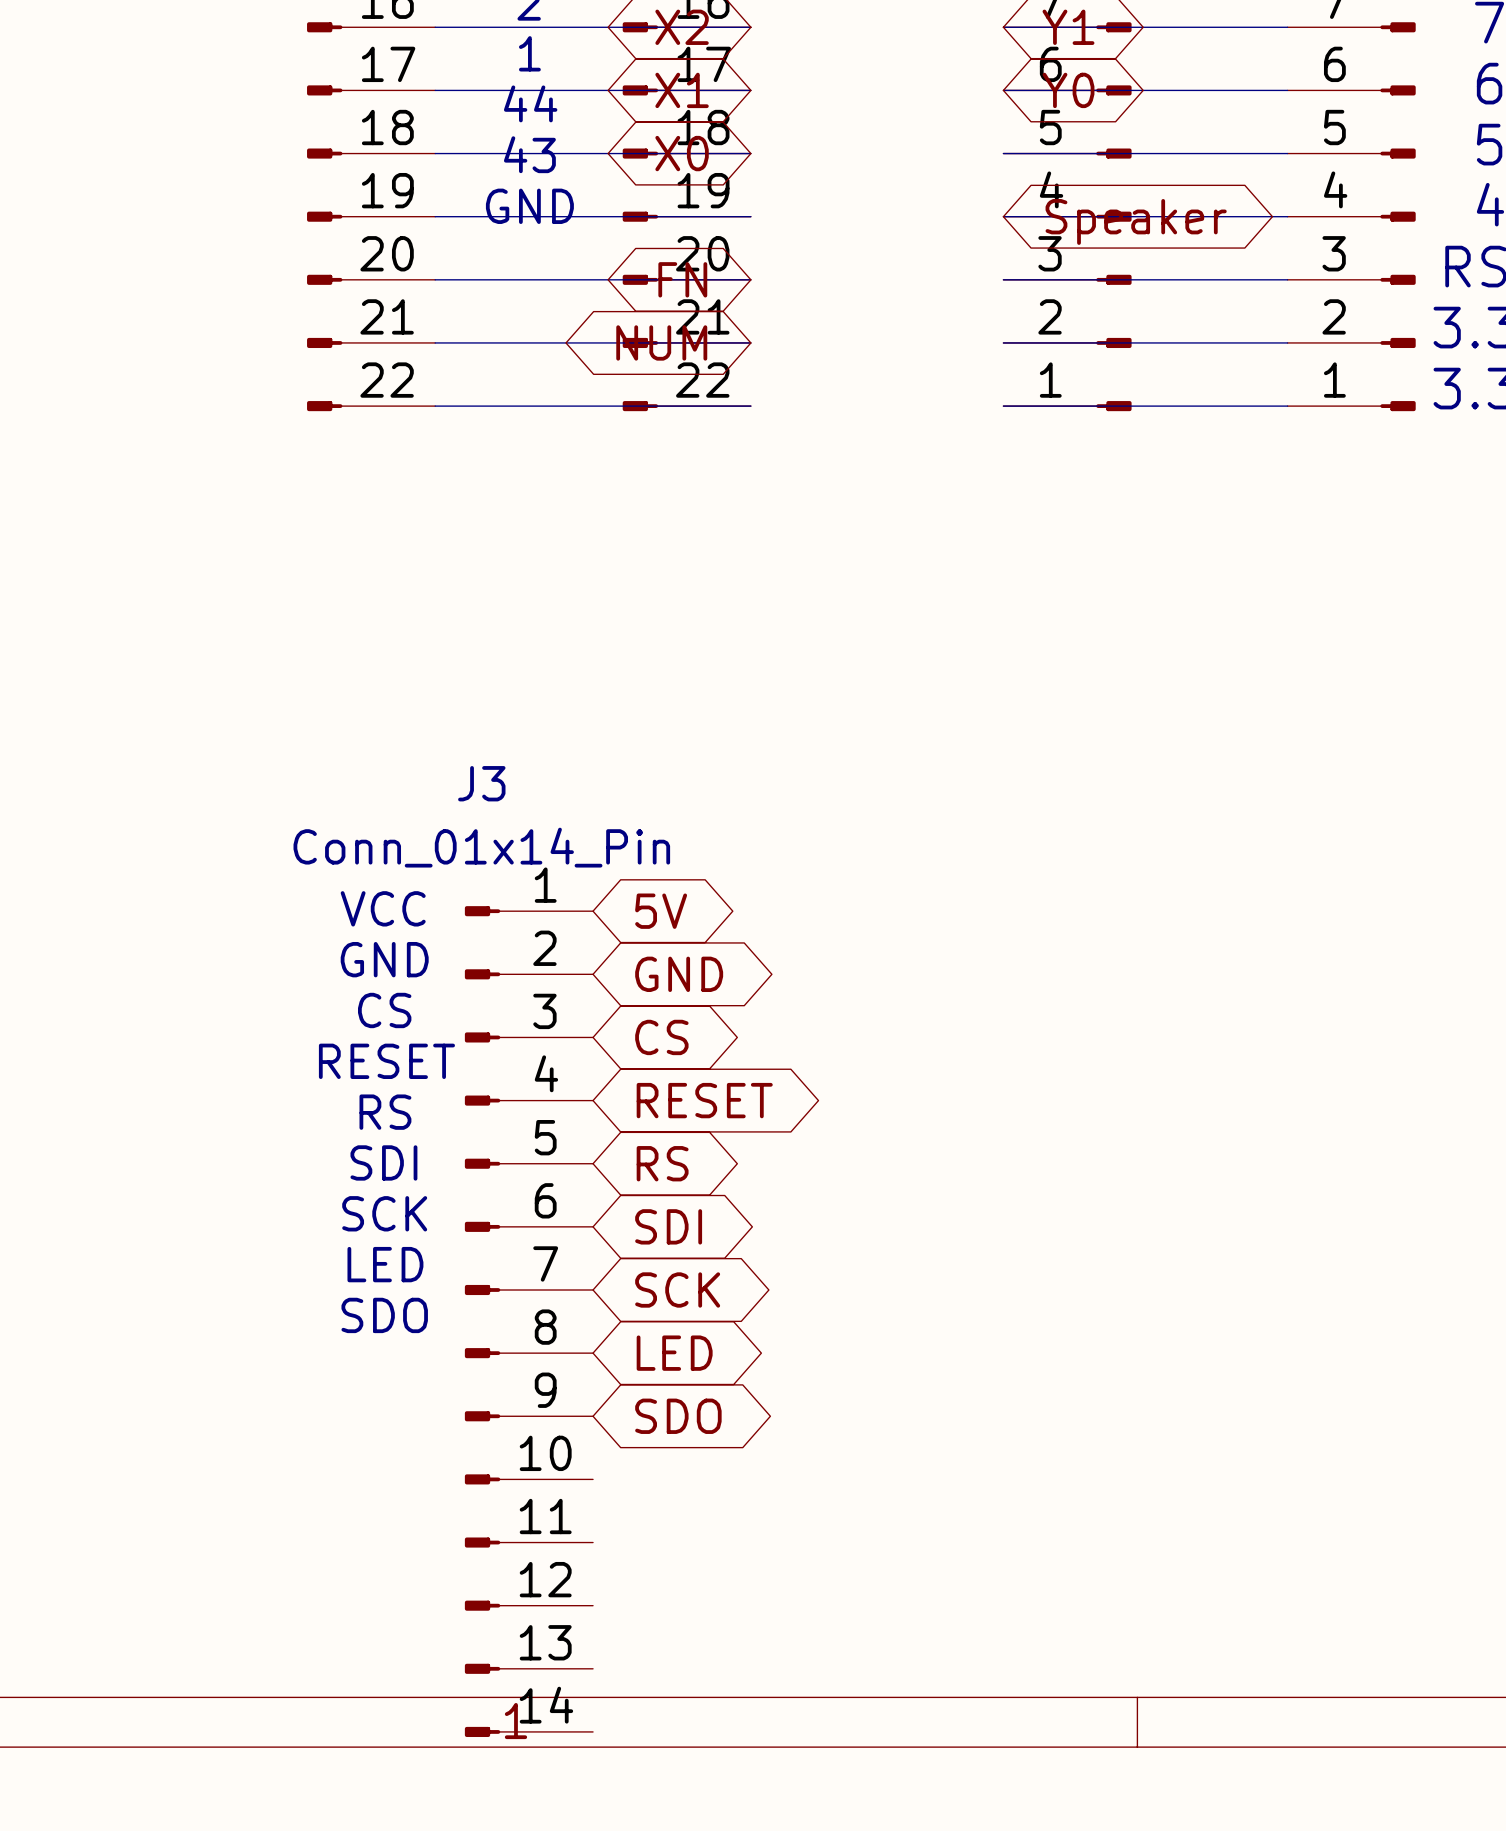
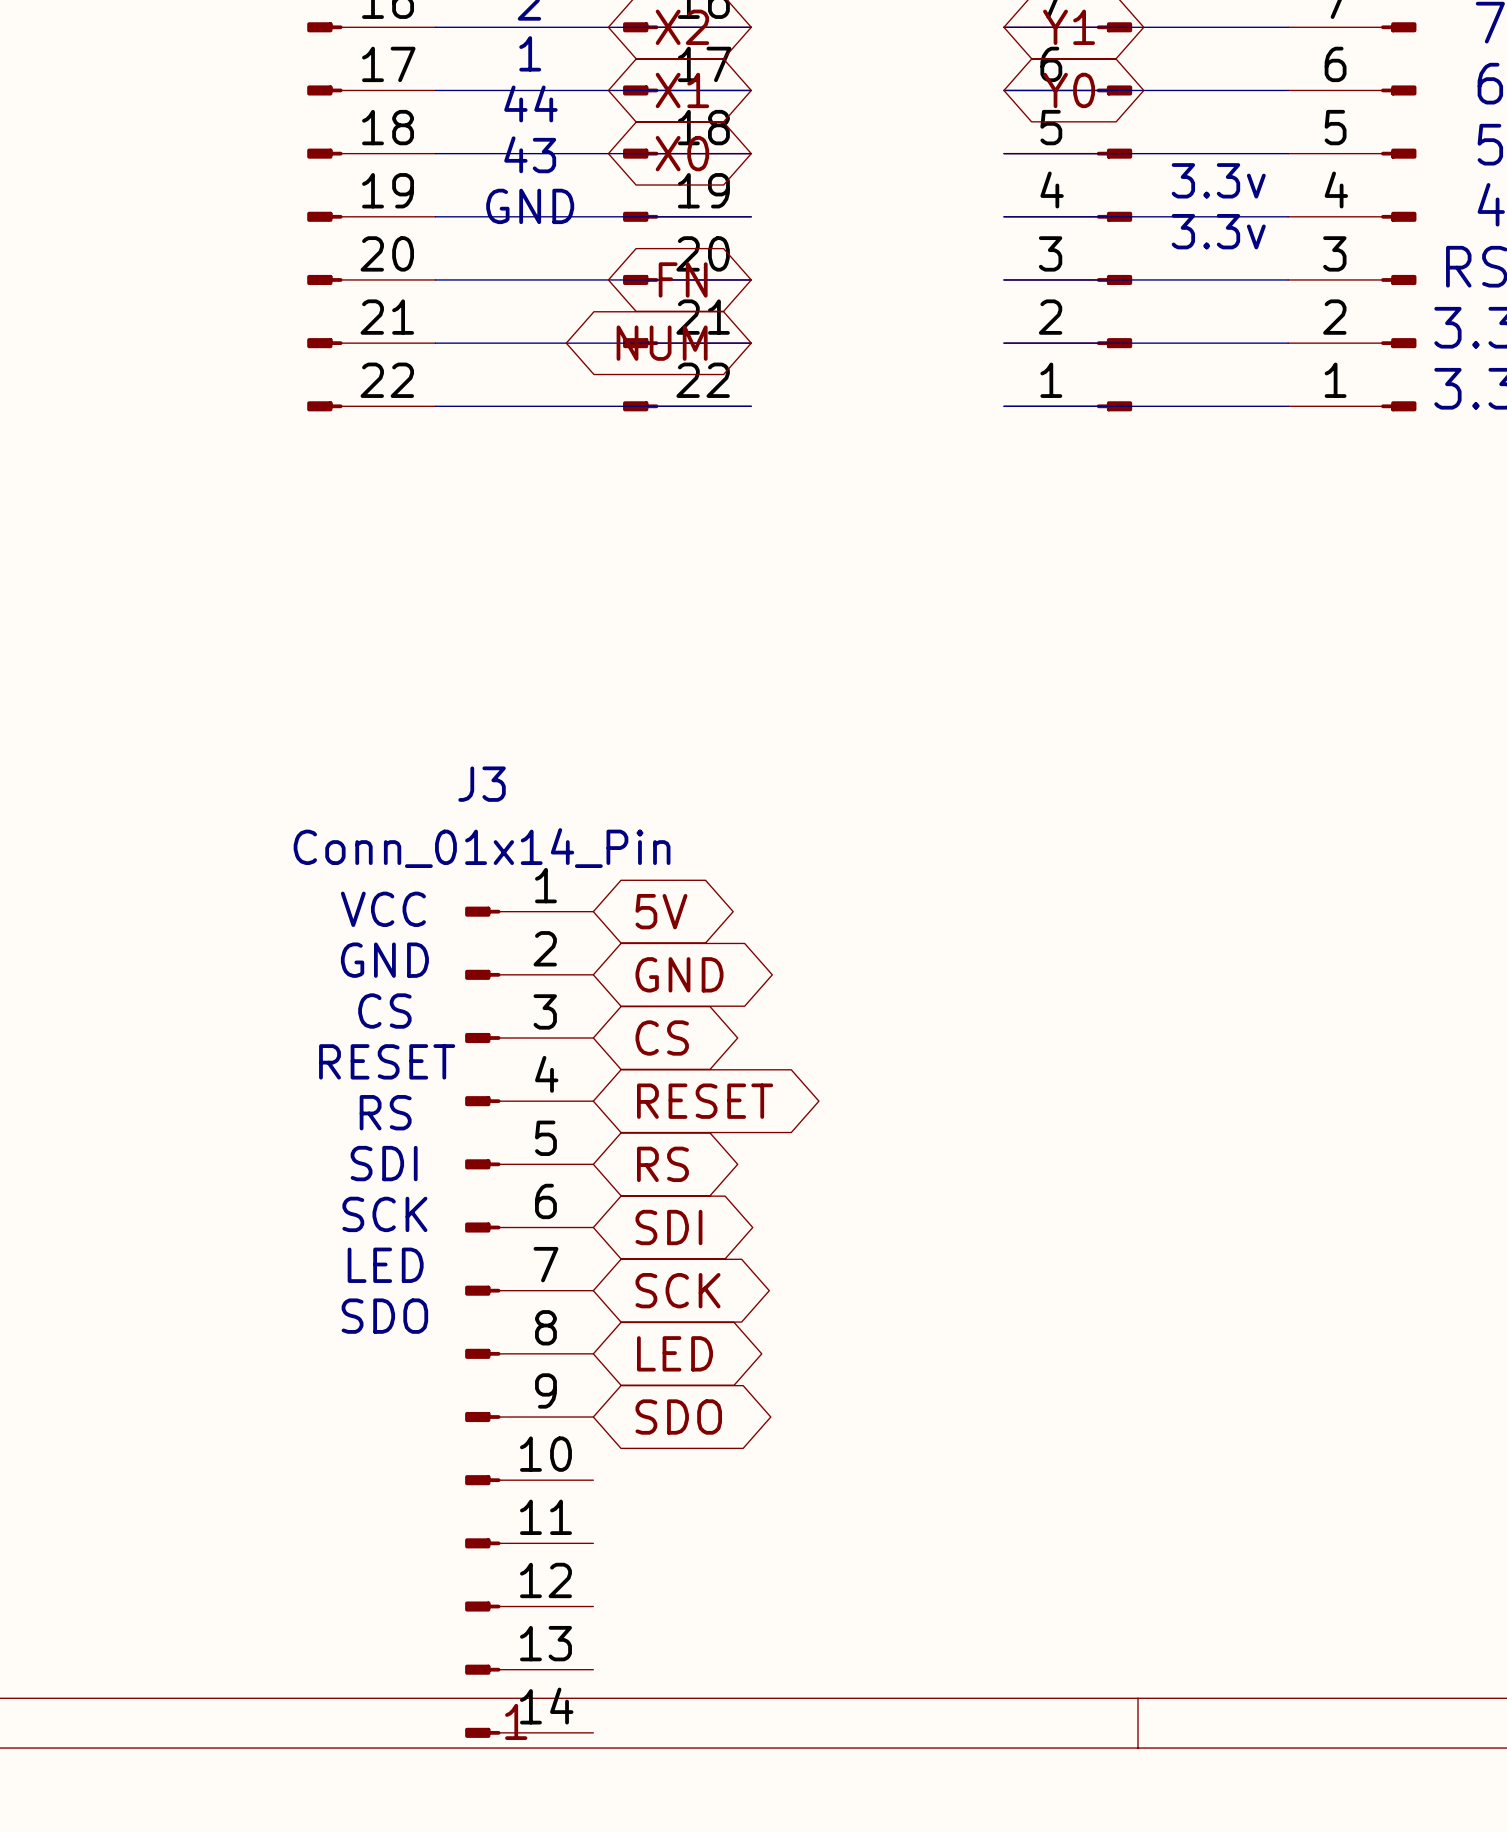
text: none -> 3.3v (1218, 180)
global label: Speaker (1136, 221) -> none
text: none -> 3.3v (1218, 231)

